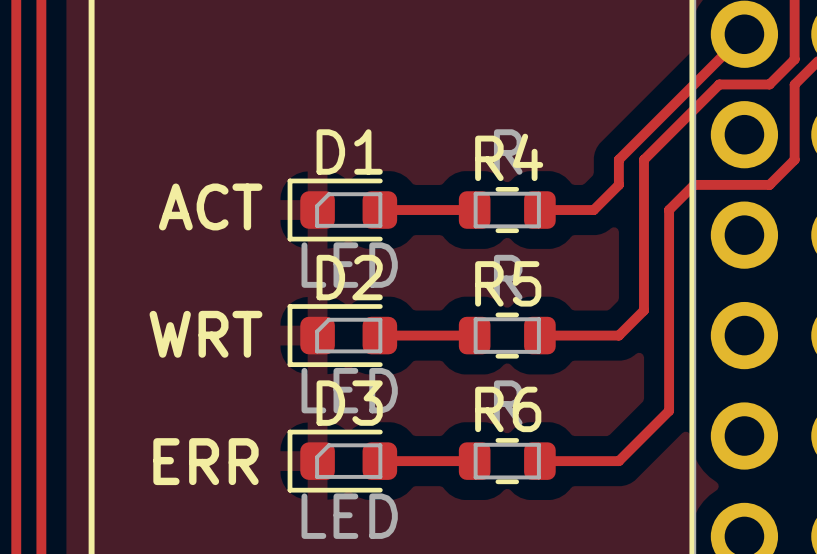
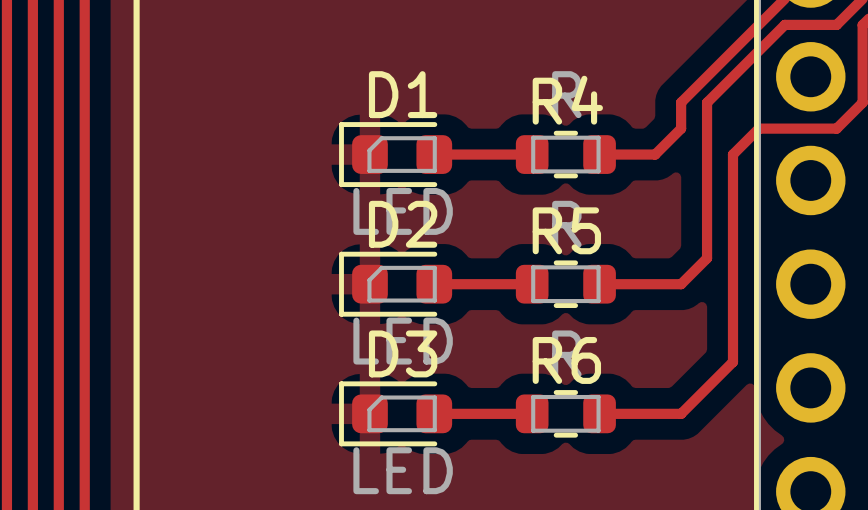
text: ACT (210, 206) -> none
text: WRT (205, 334) -> none
text: ERR (205, 461) -> none

